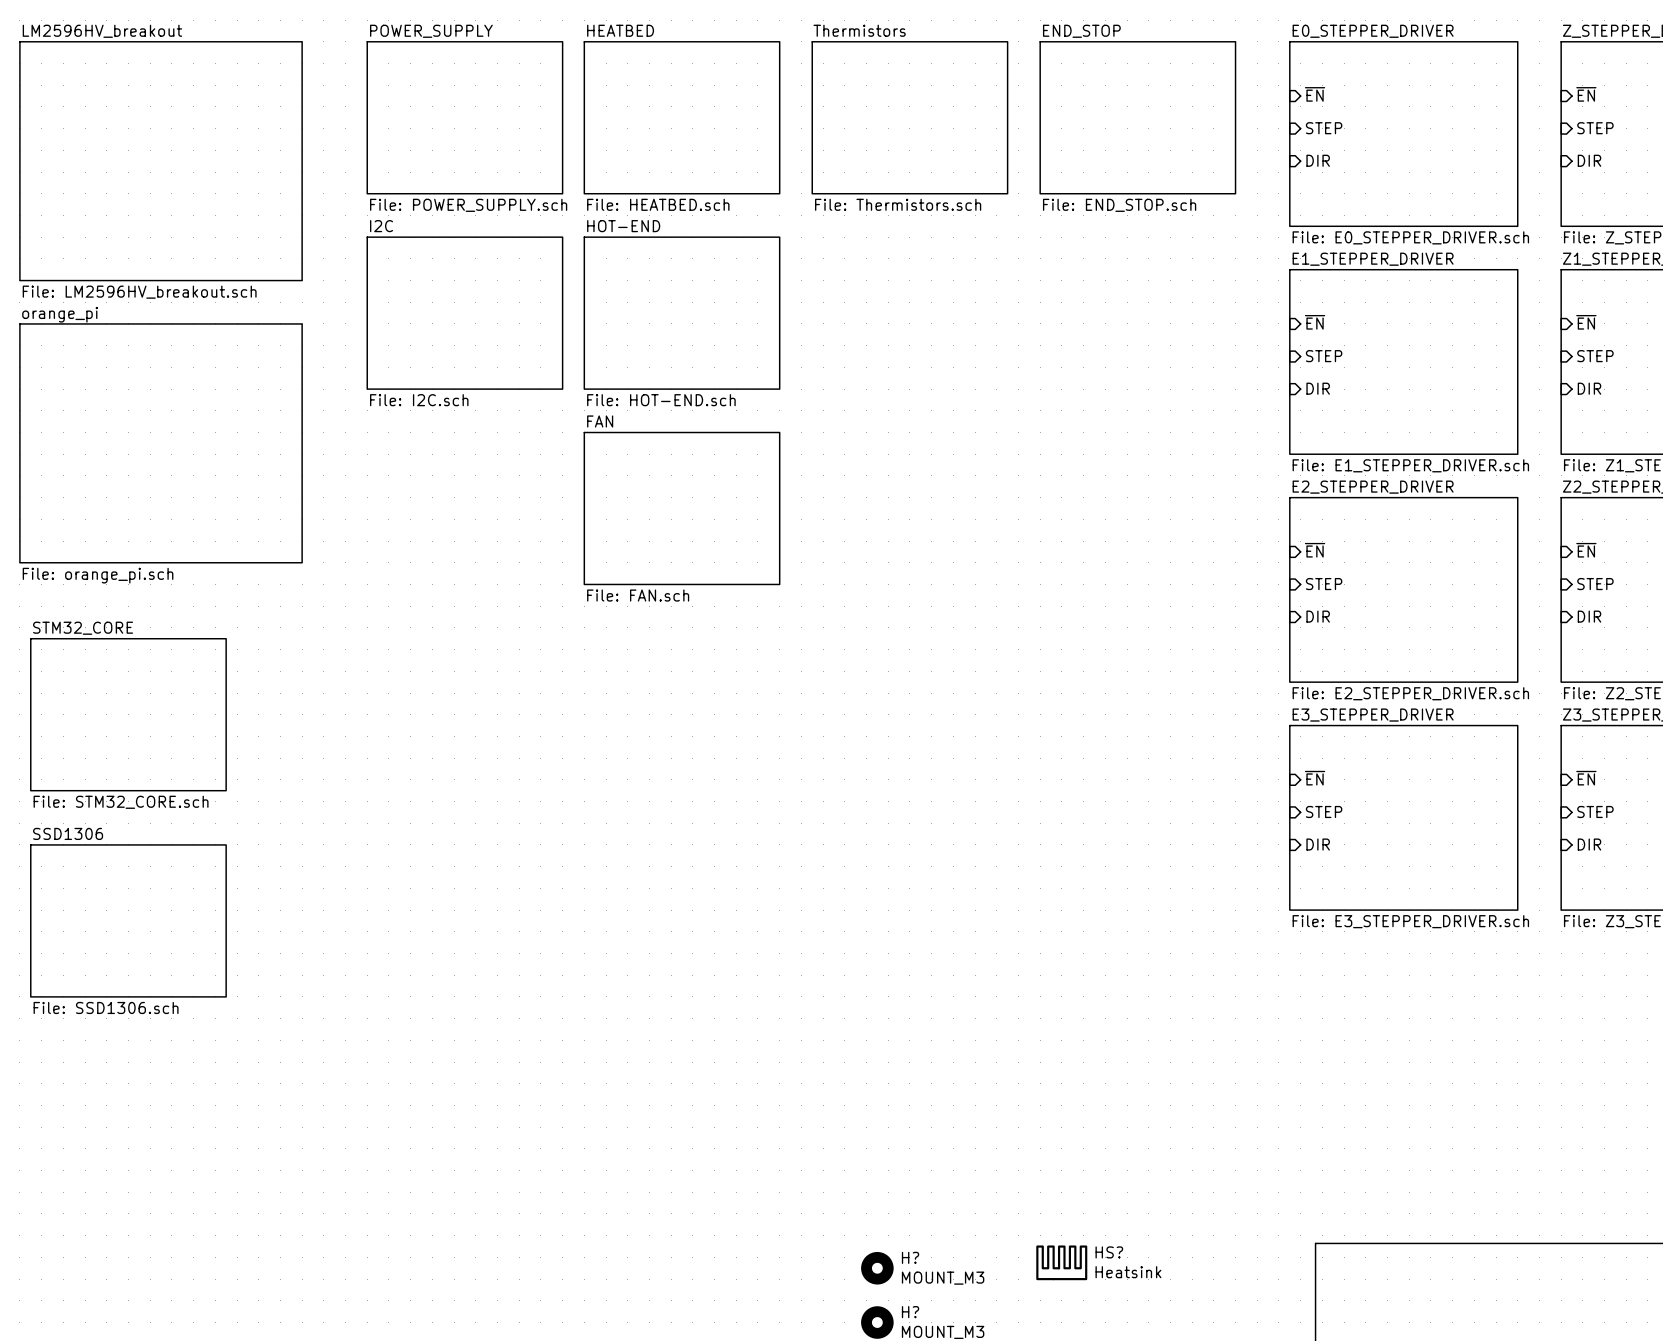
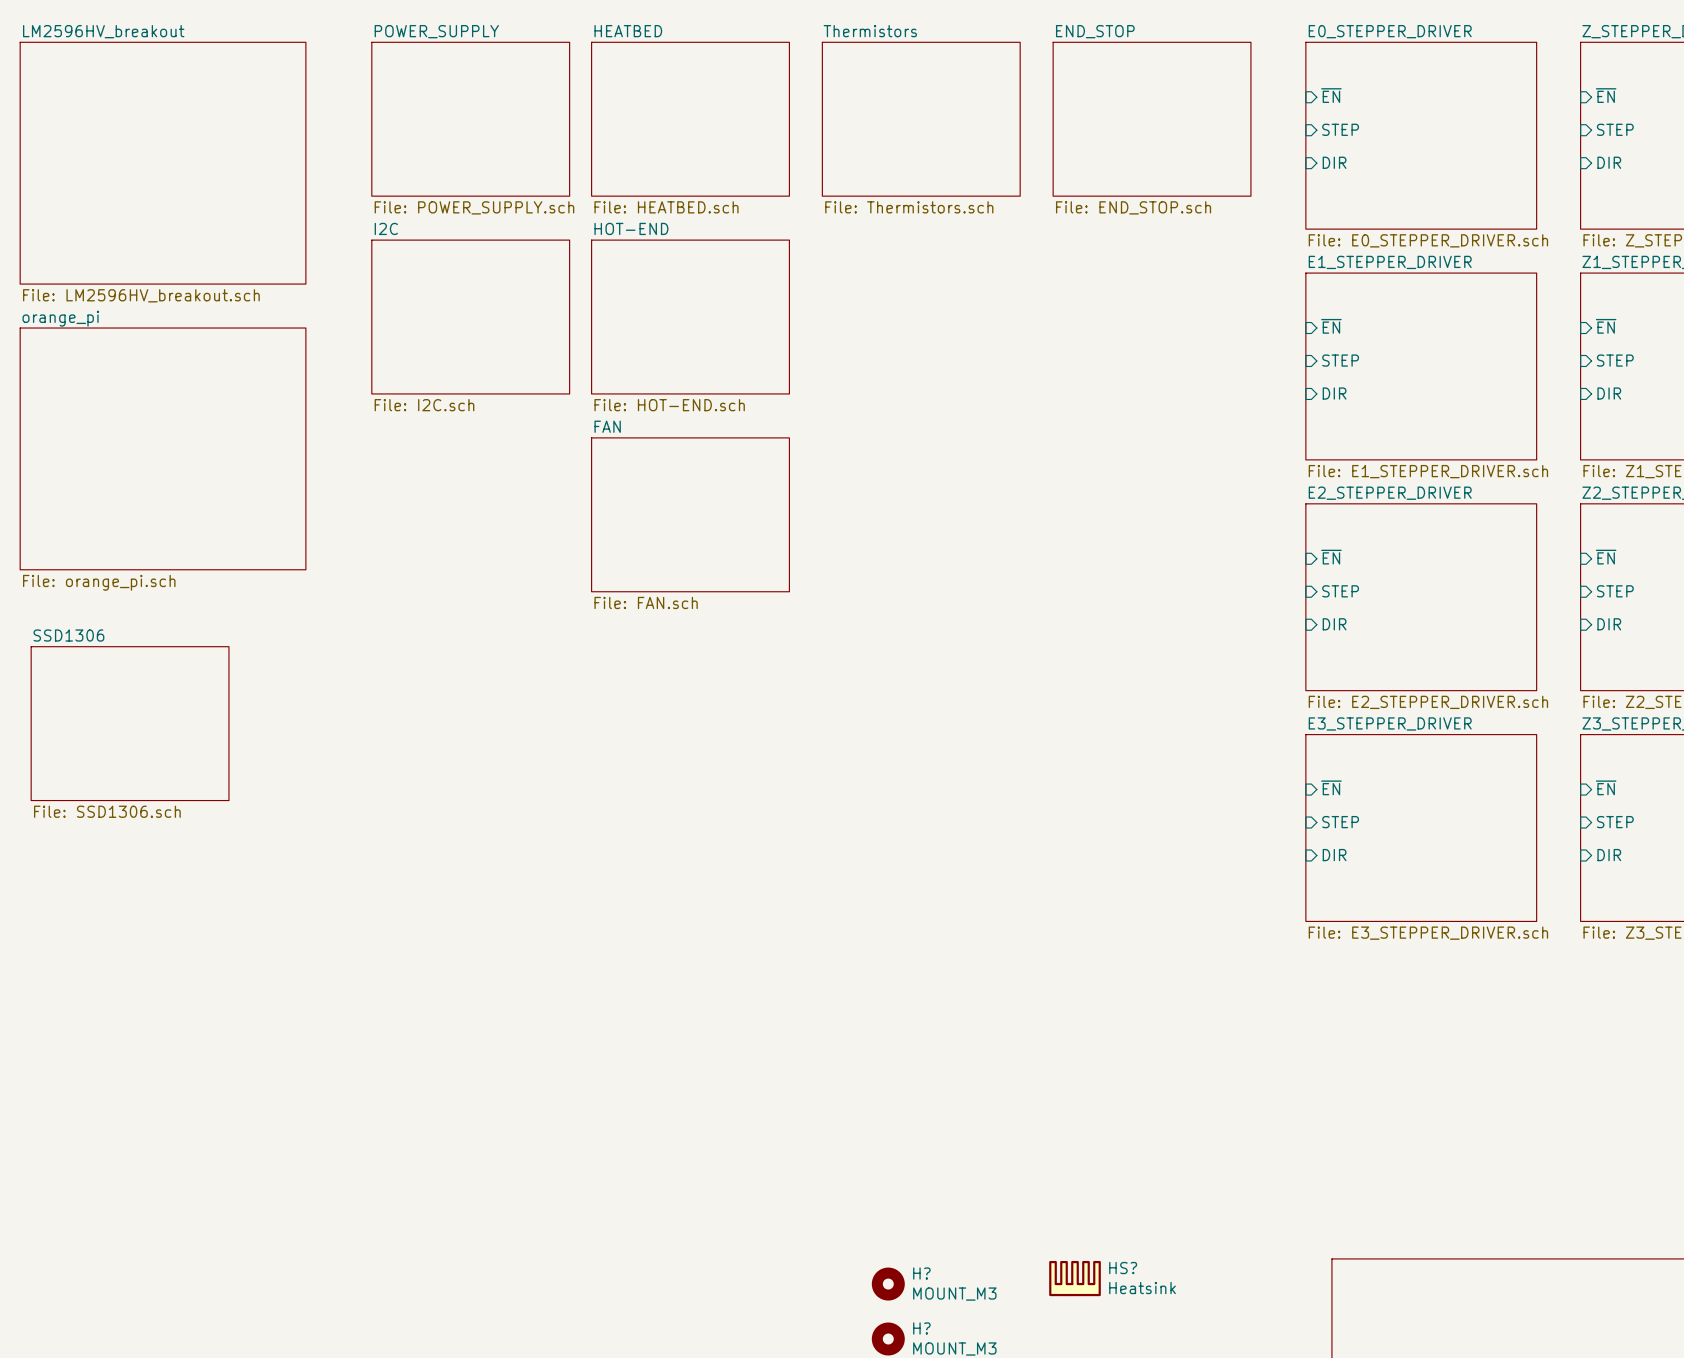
sheet STM32_CORE name: STM32_CORE (83, 628) -> SSD1306 (68, 635)
sheet STM32_CORE value: File: STM32_CORE.sch (121, 802) -> File: SSD1306.sch (107, 811)
sheet SSD1306: File: SSD1306.sch (128, 920) -> none

